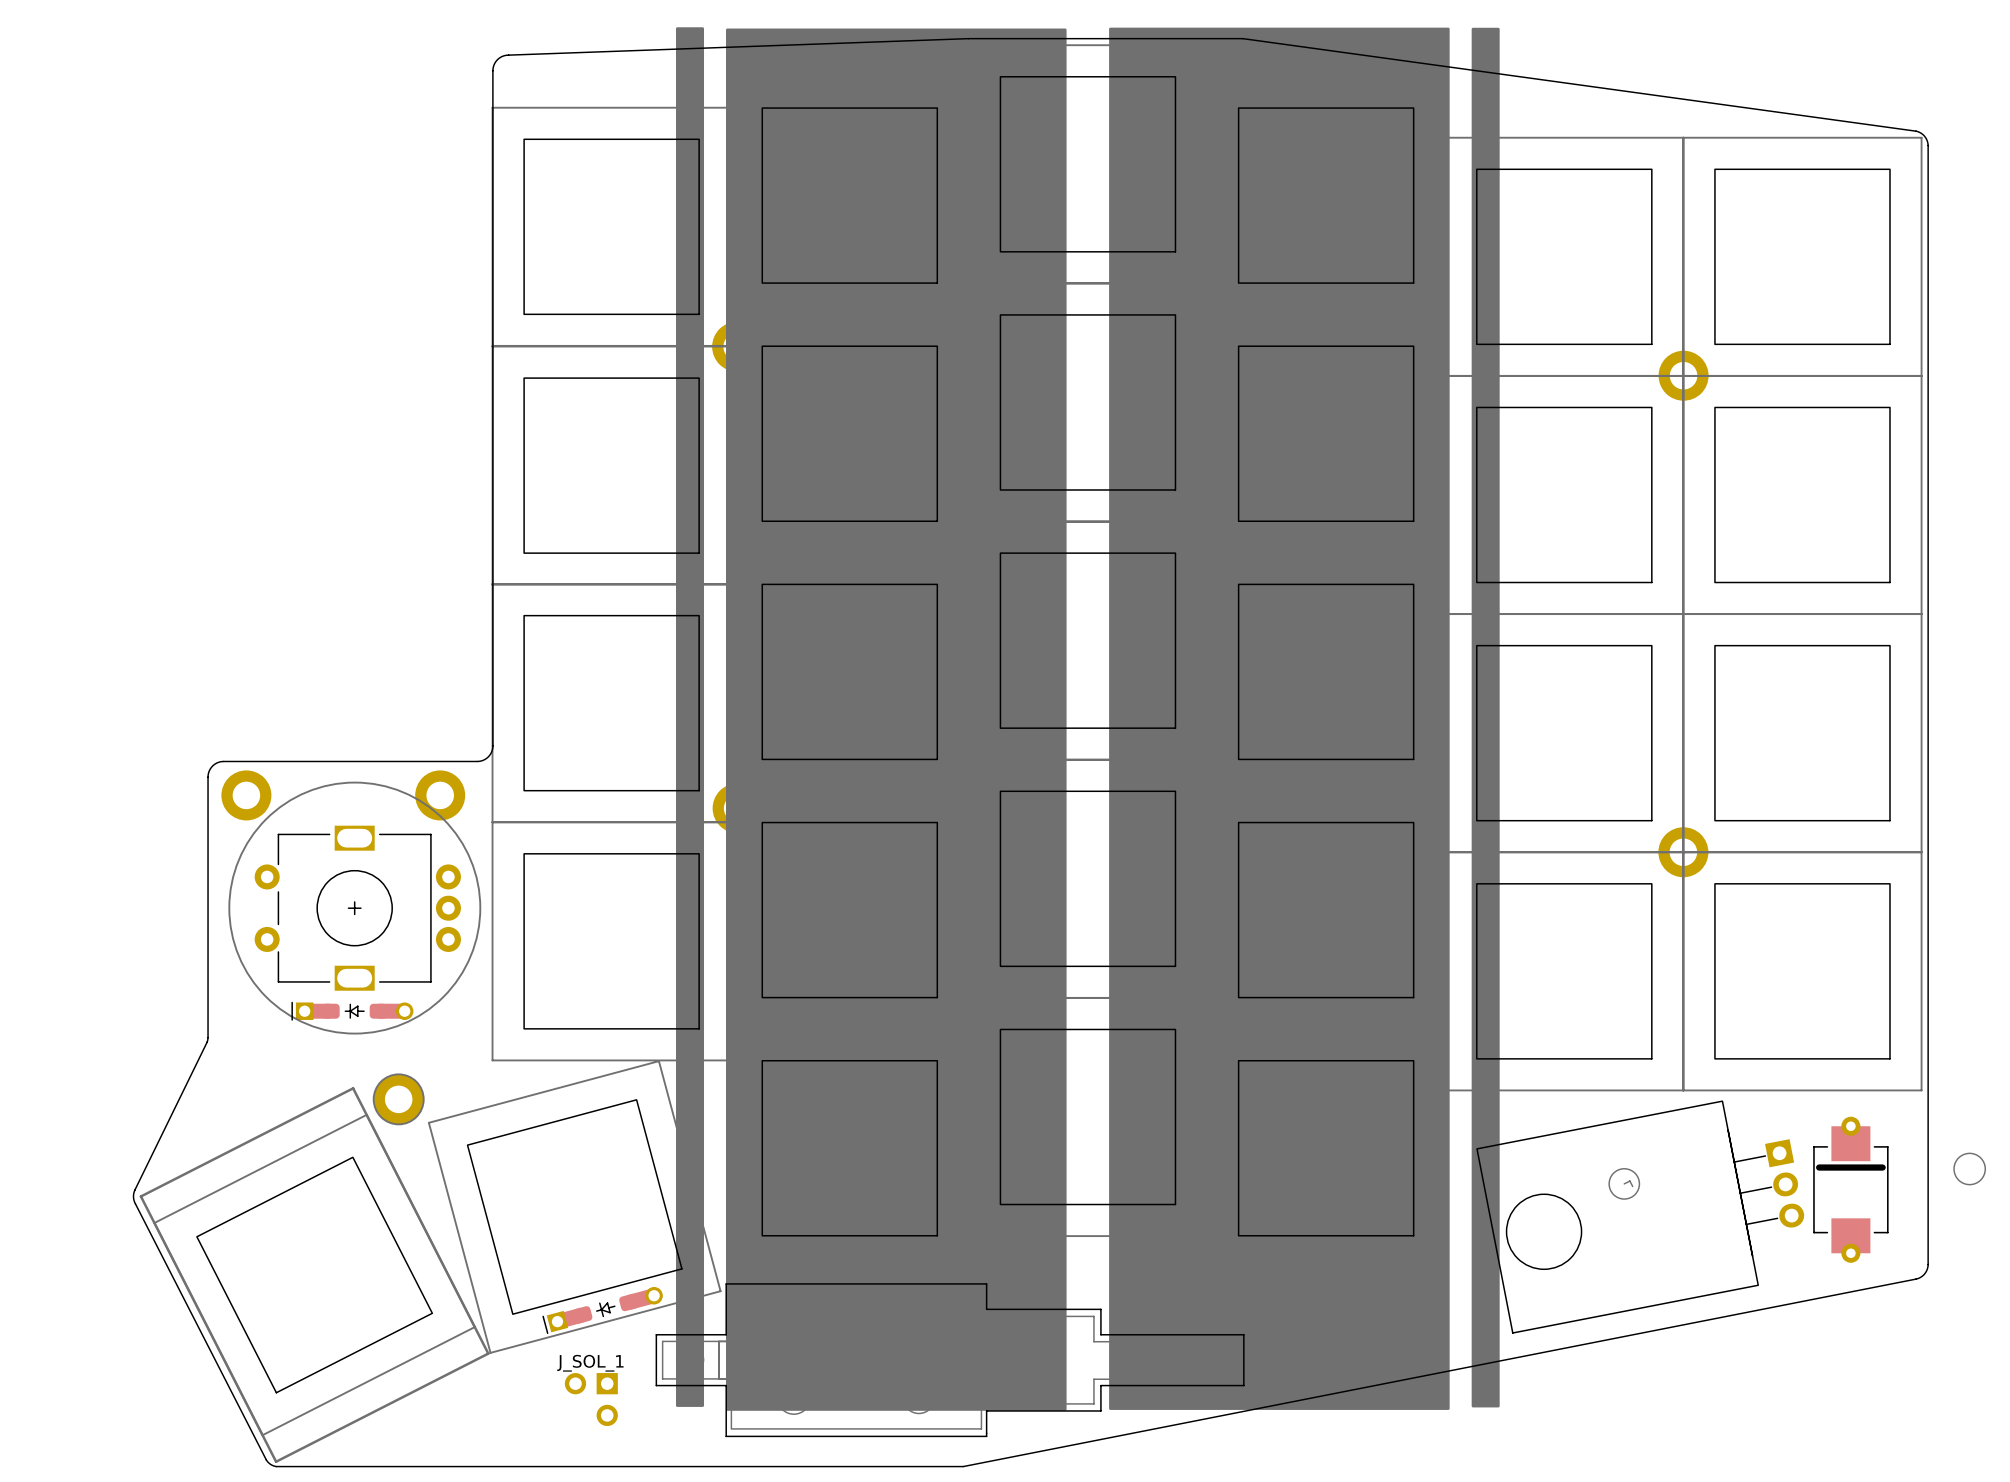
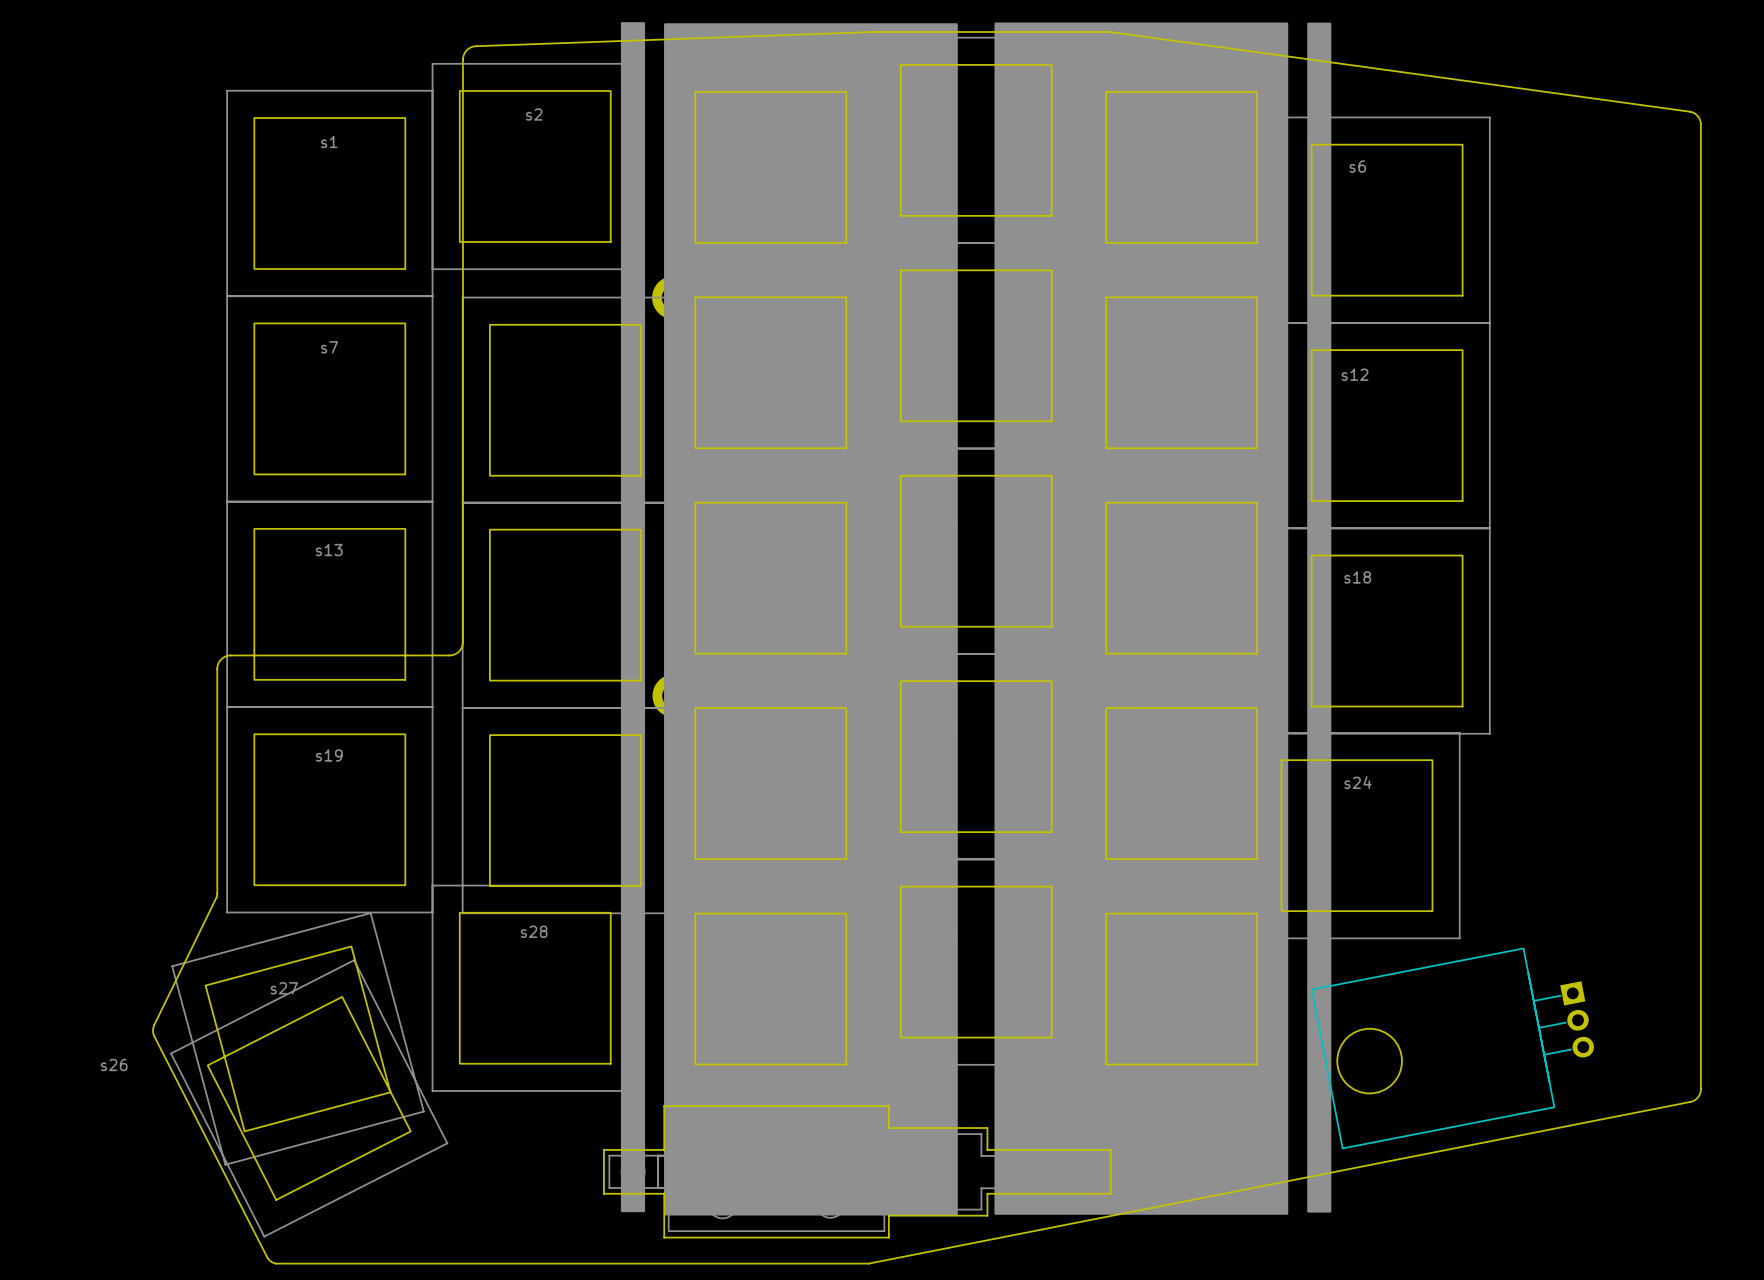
drawing: none -> [226, 89, 639, 1092]
text: none -> s2 (534, 114)
drawing: [1682, 136, 1923, 1092] -> none
text: none -> s1 (329, 141)
text: none -> s6 (1357, 166)
drawing position: (611, 226) -> (535, 166)
part: (1683, 375) -> none
text: none -> s7 (329, 347)
text: none -> s12 (1355, 374)
text: none -> s13 (329, 550)
text: none -> s18 (1357, 577)
drawing: [228, 781, 482, 1035] -> none
part: (246, 795) -> none
part: (440, 795) -> none
part: (1683, 852) -> none
text: none -> s19 (329, 755)
part: (357, 908) -> none
text: none -> s24 (1358, 782)
drawing position: (1564, 971) -> (1356, 835)
part: (352, 1011) -> none
drawing: [372, 1073, 425, 1126] -> none
text: none -> s28 (534, 931)
line: (353, 1088) (140, 1196) (276, 1461) (488, 1353) (353, 1088) -> none
part: (398, 1099) -> none
text: none -> s27 (284, 988)
drawing: [1953, 1152, 1986, 1186] -> none
drawing: [1608, 1168, 1641, 1200] -> none
line: (1629, 1180) (1632, 1186) -> none
line: (1629, 1181) (1624, 1183) -> none
part: (1850, 1189) -> none
drawing position: (574, 1207) -> (298, 1038)
text: none -> s26 (114, 1064)
part: (602, 1310) -> none
J_SOL_1: (591, 1399) -> none

